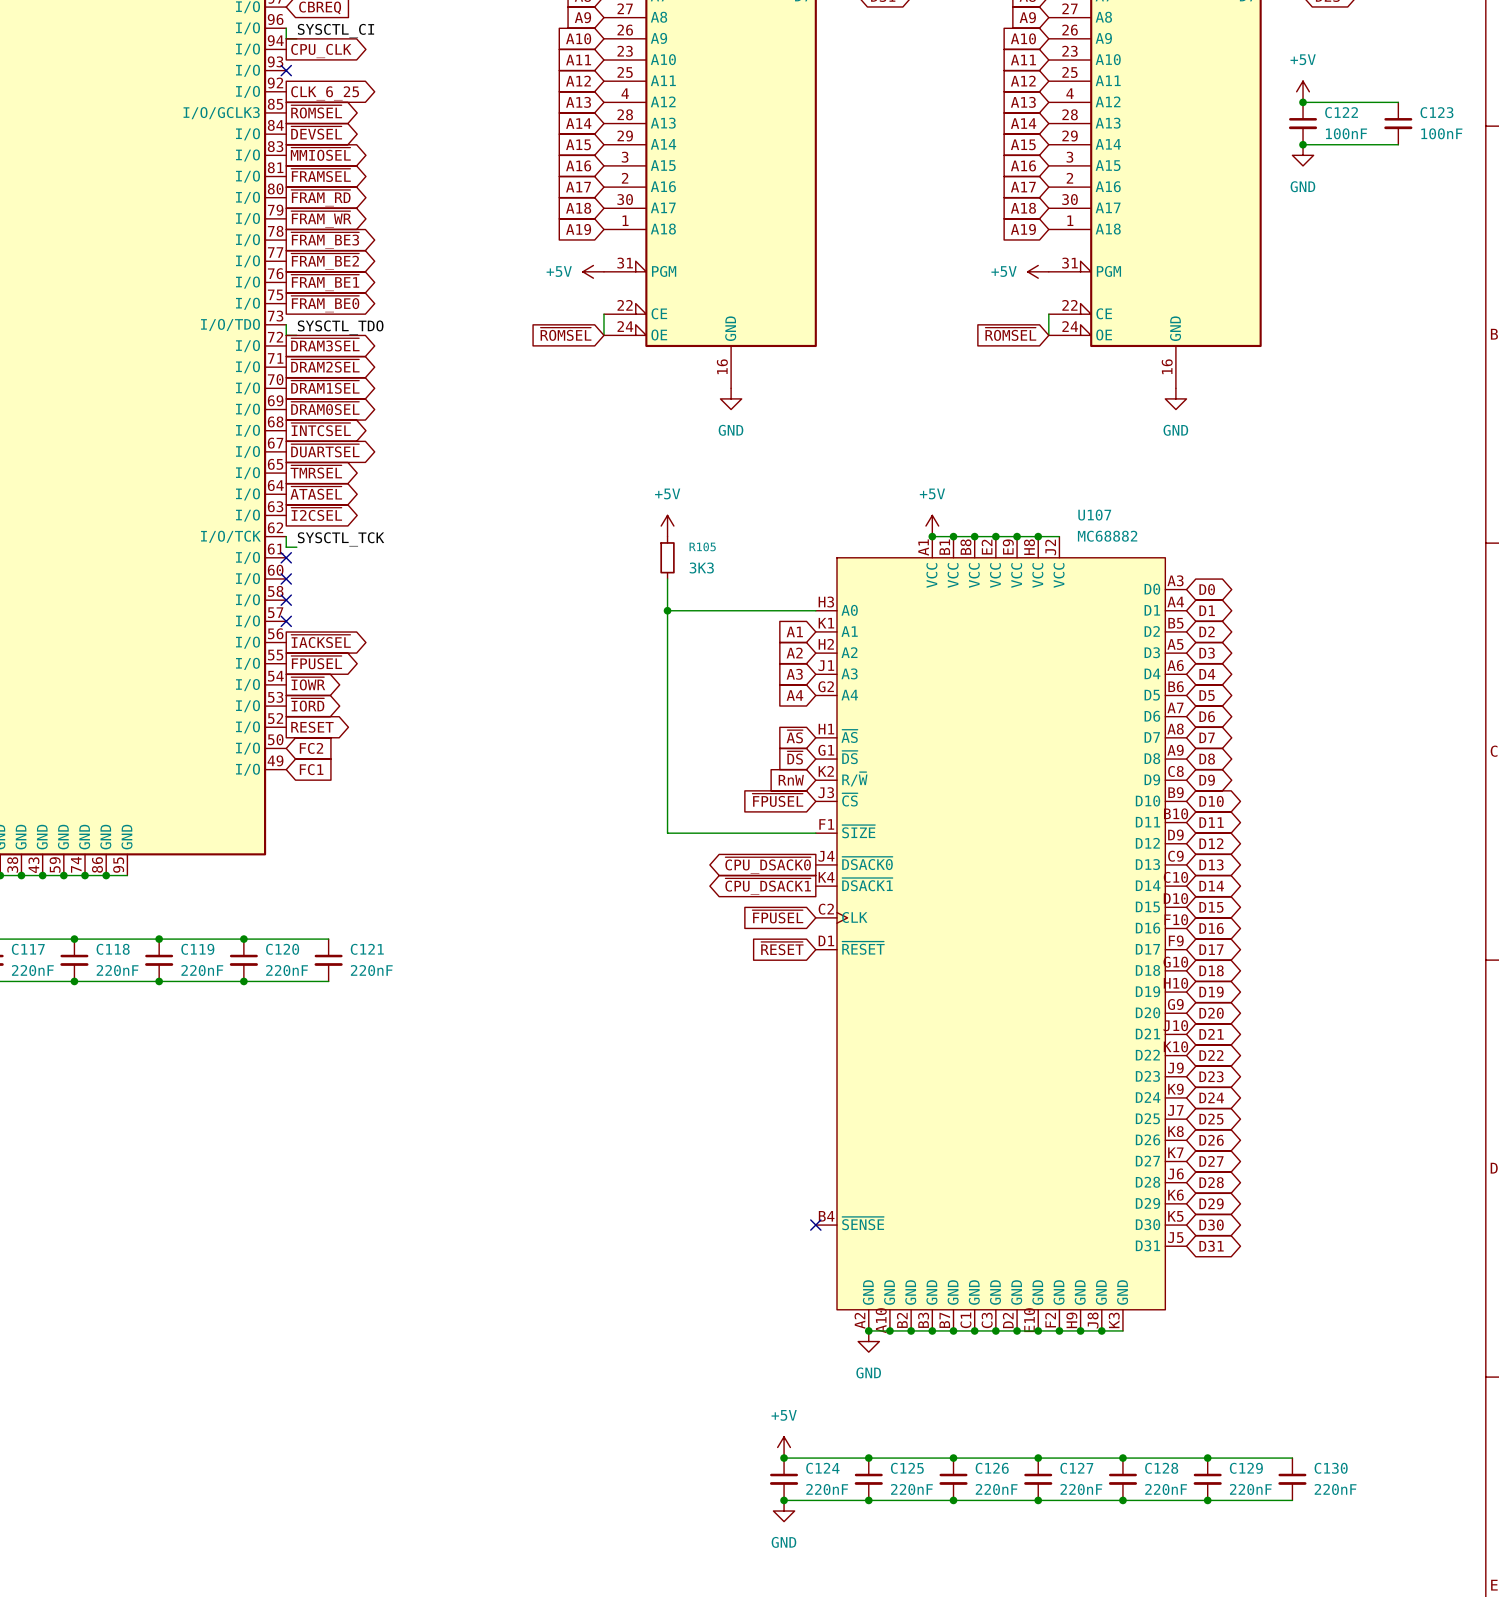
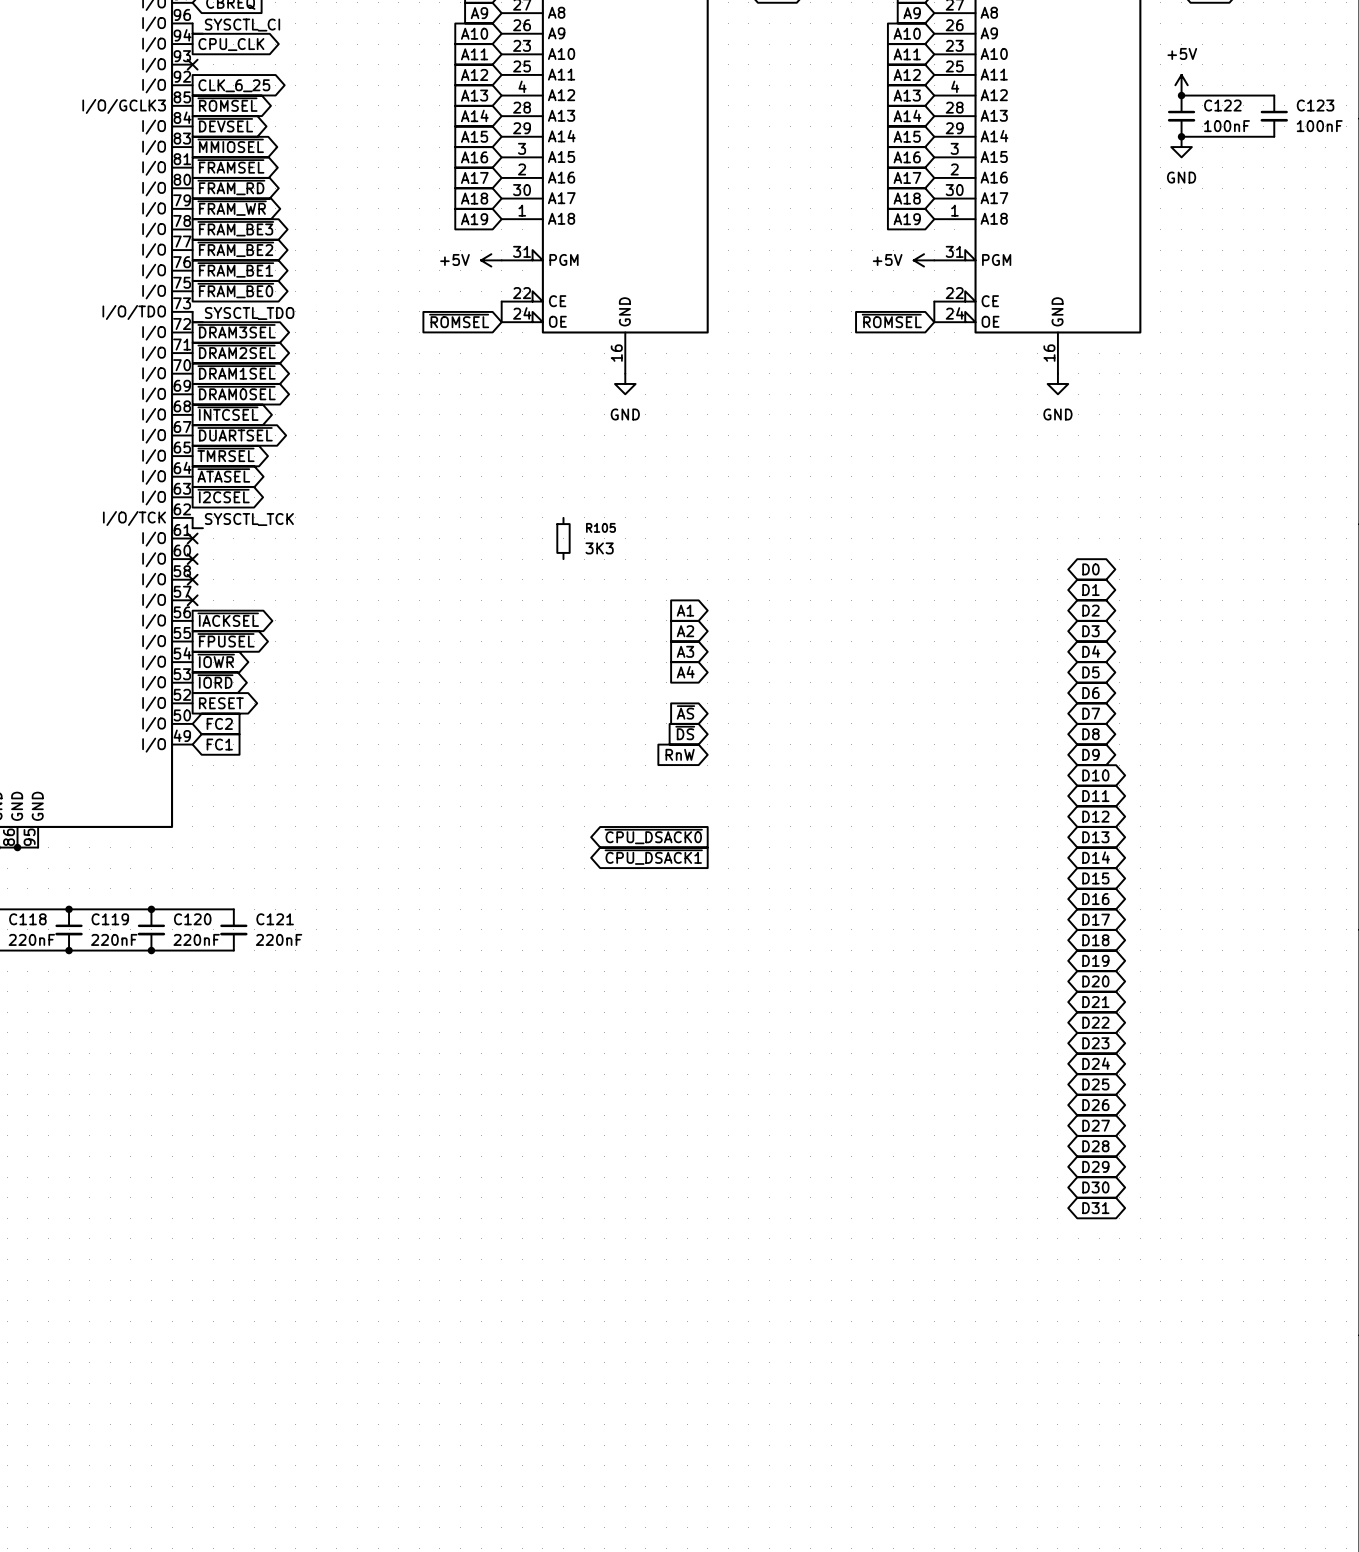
power symbol: +5V (667, 526) -> none
power symbol: +5V (932, 526) -> none
wire: (932, 536) (1059, 536) -> none
junction: (932, 536) -> none
junction: (953, 536) -> none
junction: (974, 536) -> none
junction: (995, 536) -> none
junction: (1017, 536) -> none
junction: (1038, 536) -> none
wire: (667, 578) (667, 833) (815, 833) -> none
wire: (667, 610) (815, 610) -> none
junction: (667, 610) -> none
global label: ~{FPUSEL} (777, 800) -> none
global label: ~{FPUSEL} (777, 916) -> none
U107: MC68882 (1001, 933) -> none
global label: ~{RESET} (782, 948) -> none
no-connect mark: (815, 1225) -> none
wire: (868, 1330) (1122, 1330) -> none
junction: (868, 1330) -> none
junction: (889, 1330) -> none
junction: (911, 1330) -> none
junction: (932, 1330) -> none
junction: (953, 1330) -> none
junction: (974, 1330) -> none
junction: (995, 1330) -> none
junction: (1017, 1330) -> none
junction: (1038, 1330) -> none
junction: (1059, 1330) -> none
junction: (1080, 1330) -> none
junction: (1101, 1330) -> none
power symbol: GND (868, 1341) -> none
power symbol: +5V (784, 1447) -> none
wire: (784, 1458) (1292, 1458) -> none
junction: (784, 1458) -> none
junction: (868, 1458) -> none
junction: (953, 1458) -> none
junction: (1038, 1458) -> none
junction: (1122, 1458) -> none
junction: (1207, 1458) -> none
C124: 220nF (784, 1479) -> none
C125: 220nF (868, 1479) -> none
C126: 220nF (953, 1479) -> none
C127: 220nF (1038, 1479) -> none
C128: 220nF (1122, 1479) -> none
C129: 220nF (1207, 1479) -> none
C130: 220nF (1292, 1479) -> none
wire: (784, 1500) (1292, 1500) -> none
junction: (784, 1500) -> none
junction: (868, 1500) -> none
junction: (953, 1500) -> none
junction: (1038, 1500) -> none
junction: (1122, 1500) -> none
junction: (1207, 1500) -> none
power symbol: GND (784, 1511) -> none

